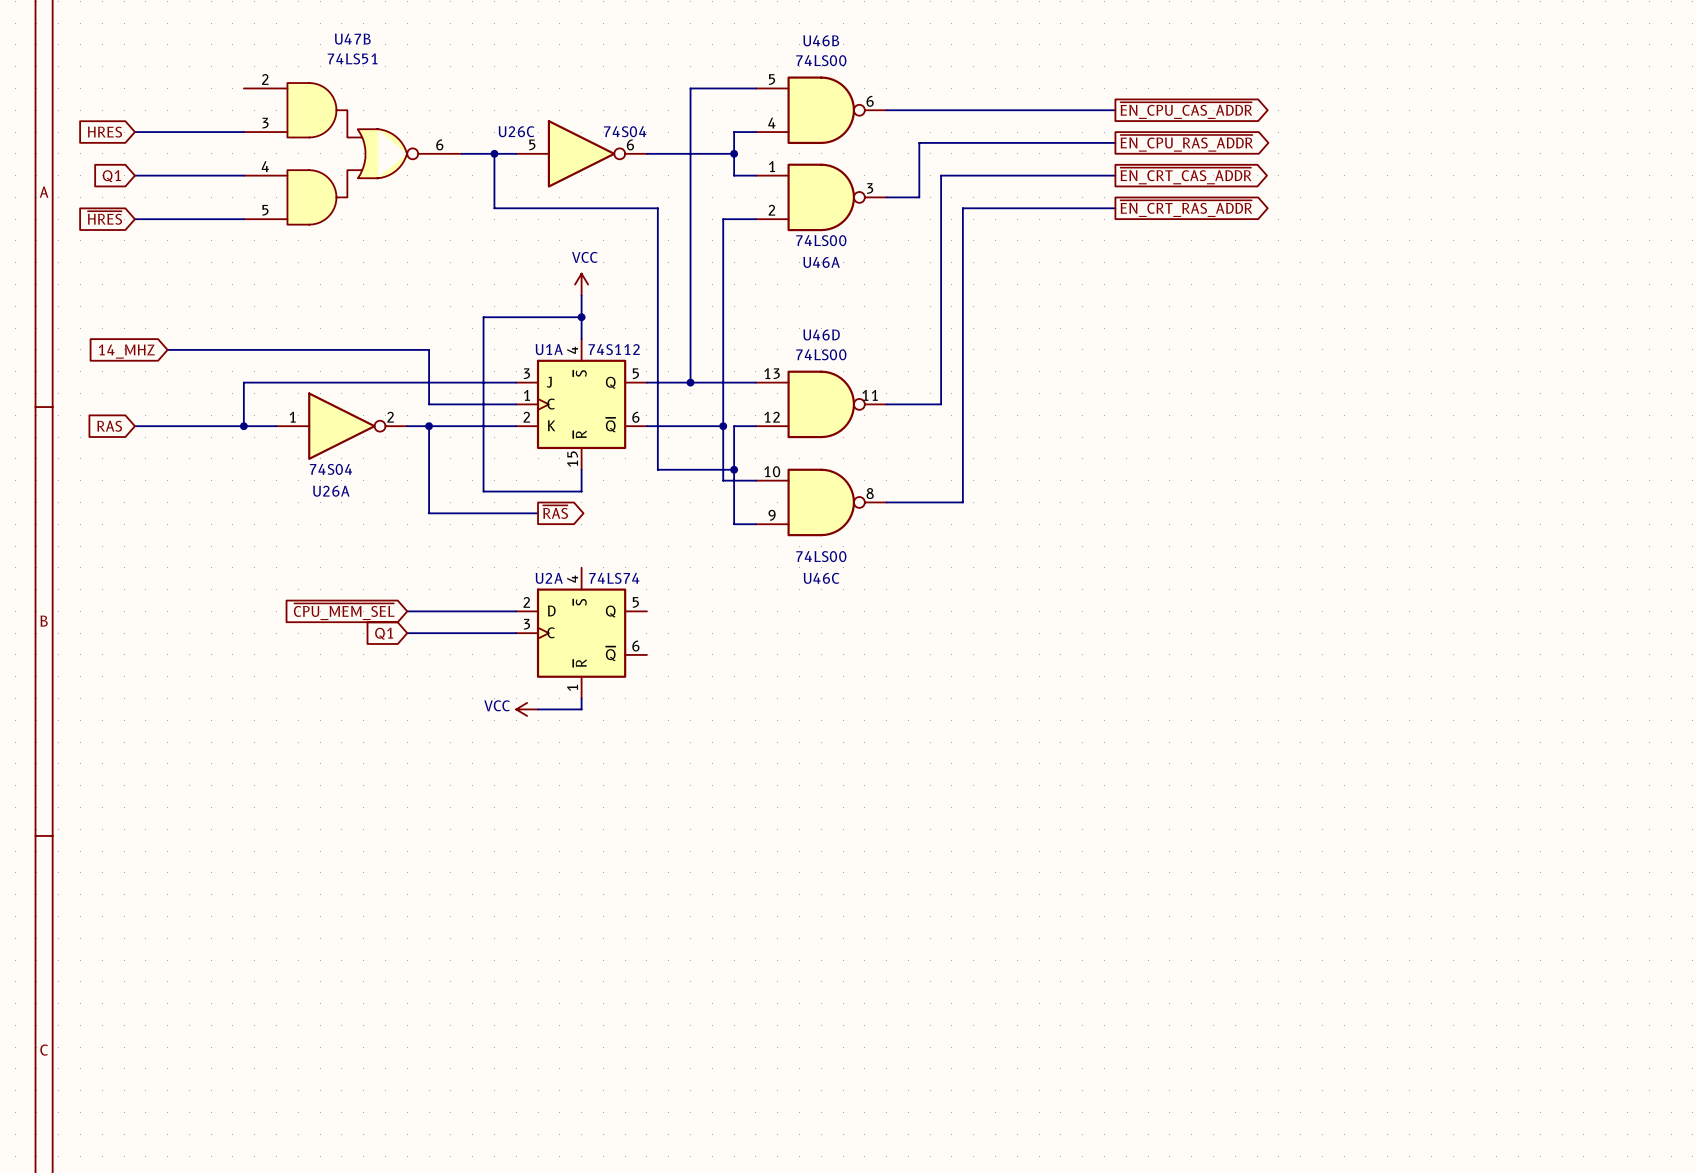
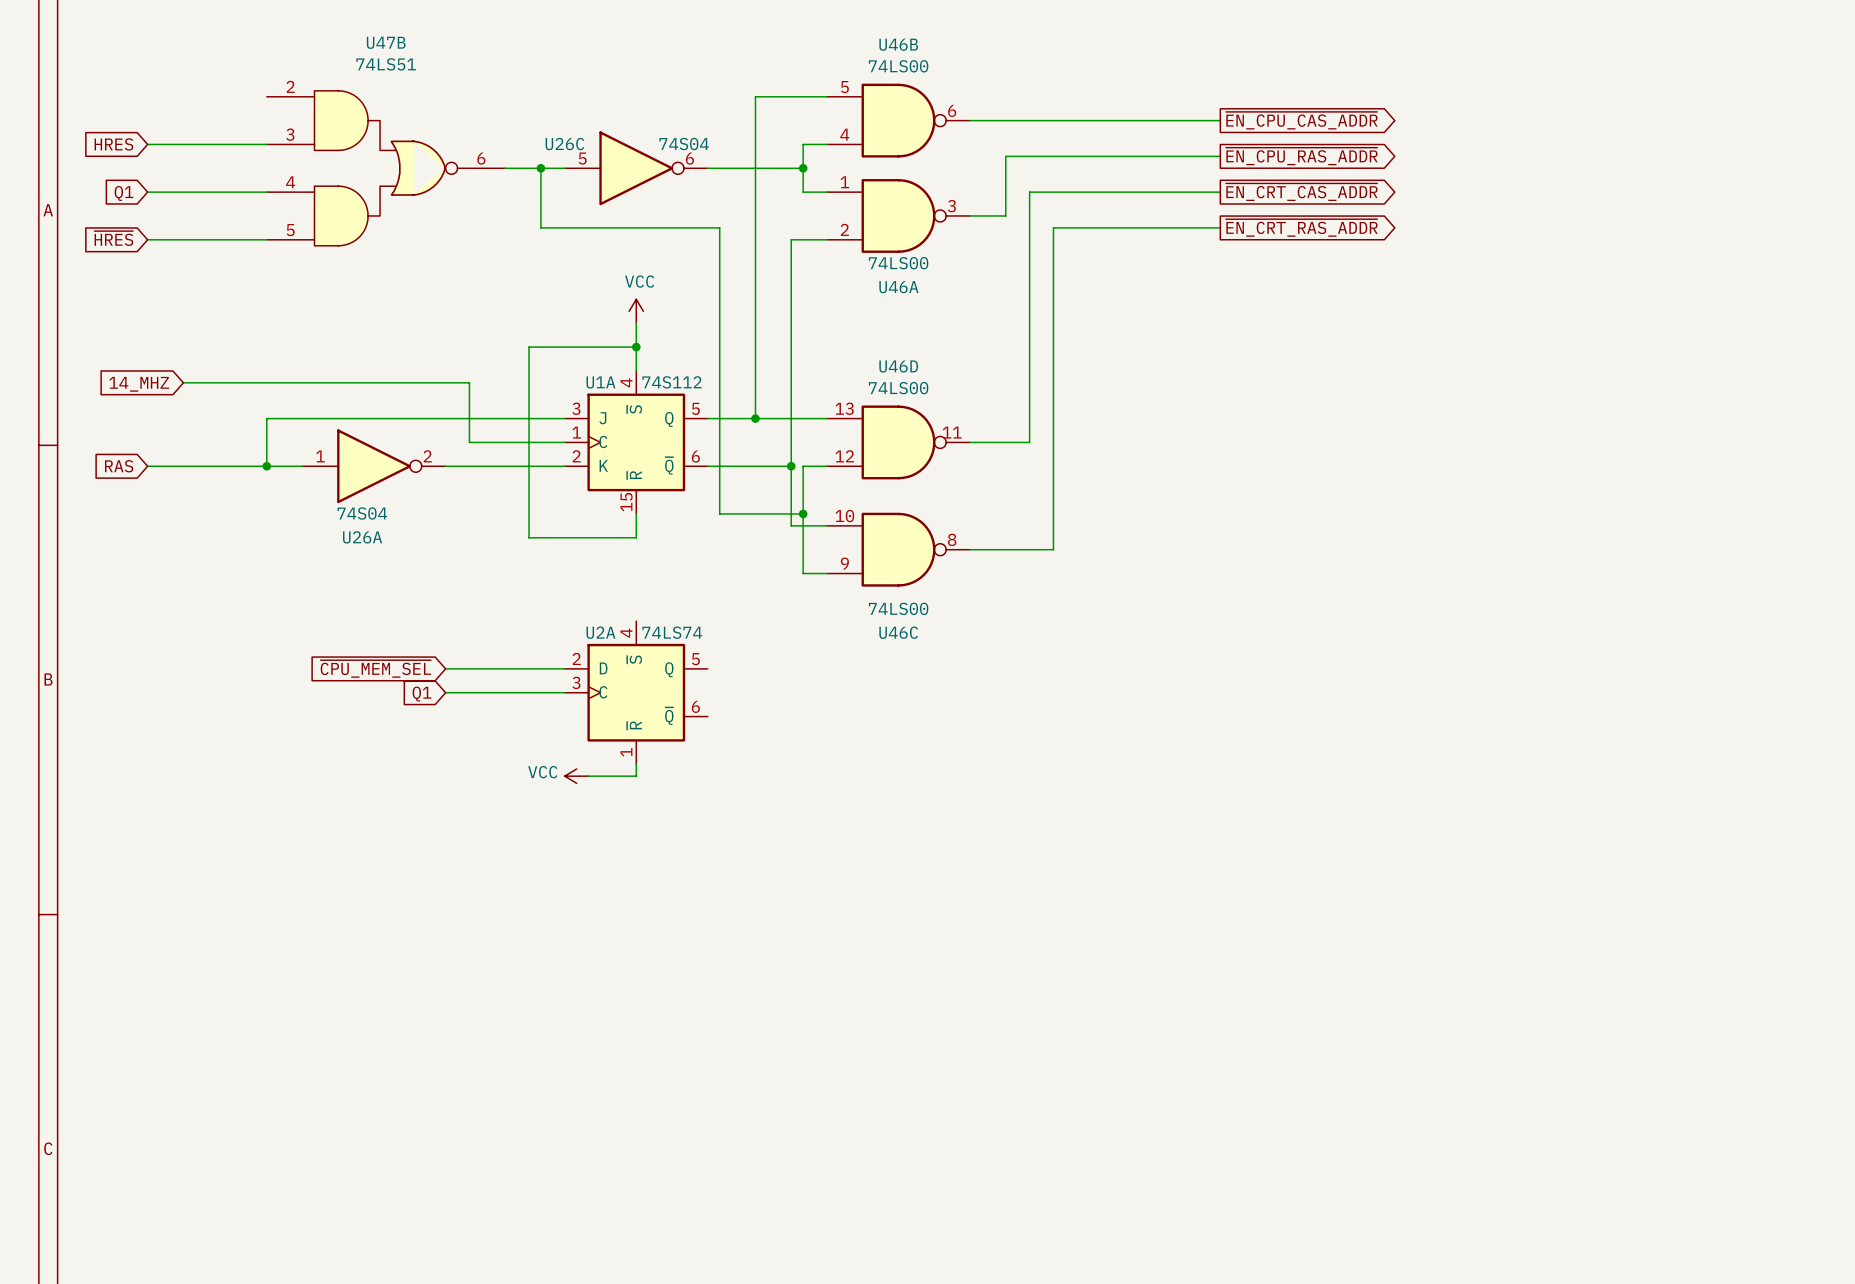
wire: (429, 426) (429, 513) (538, 513) -> none
junction: (429, 426) -> none
global label: ~{RAS} (555, 512) -> none

